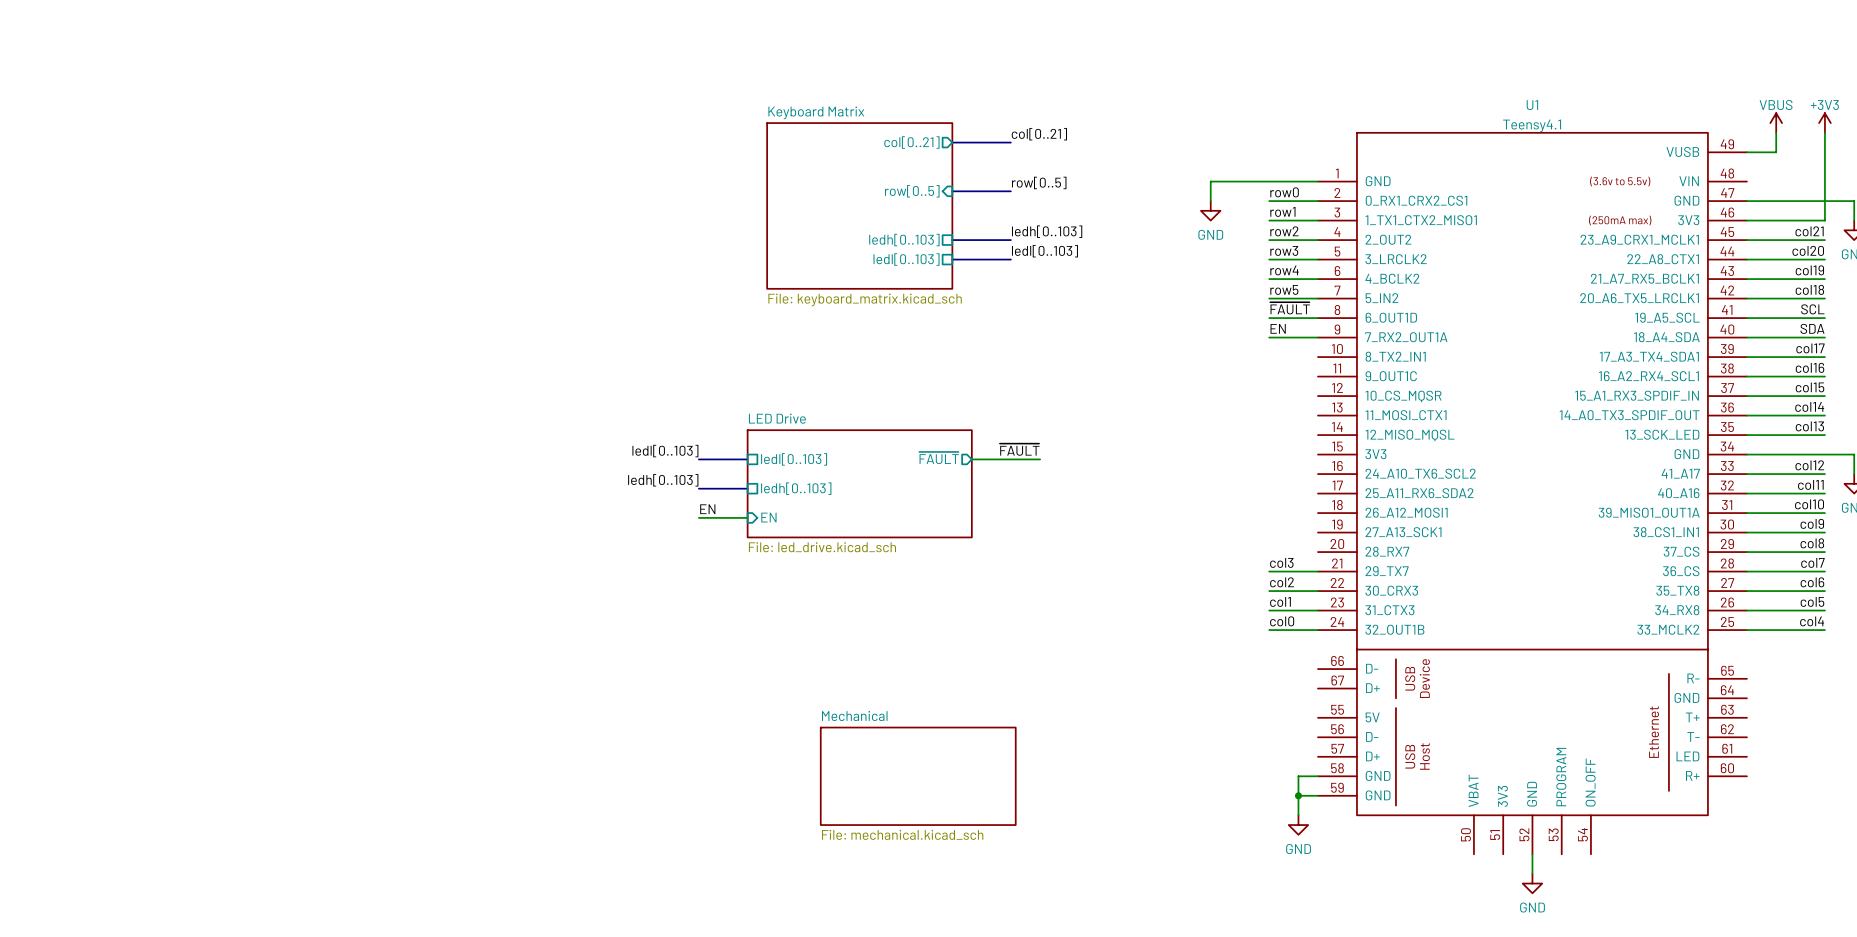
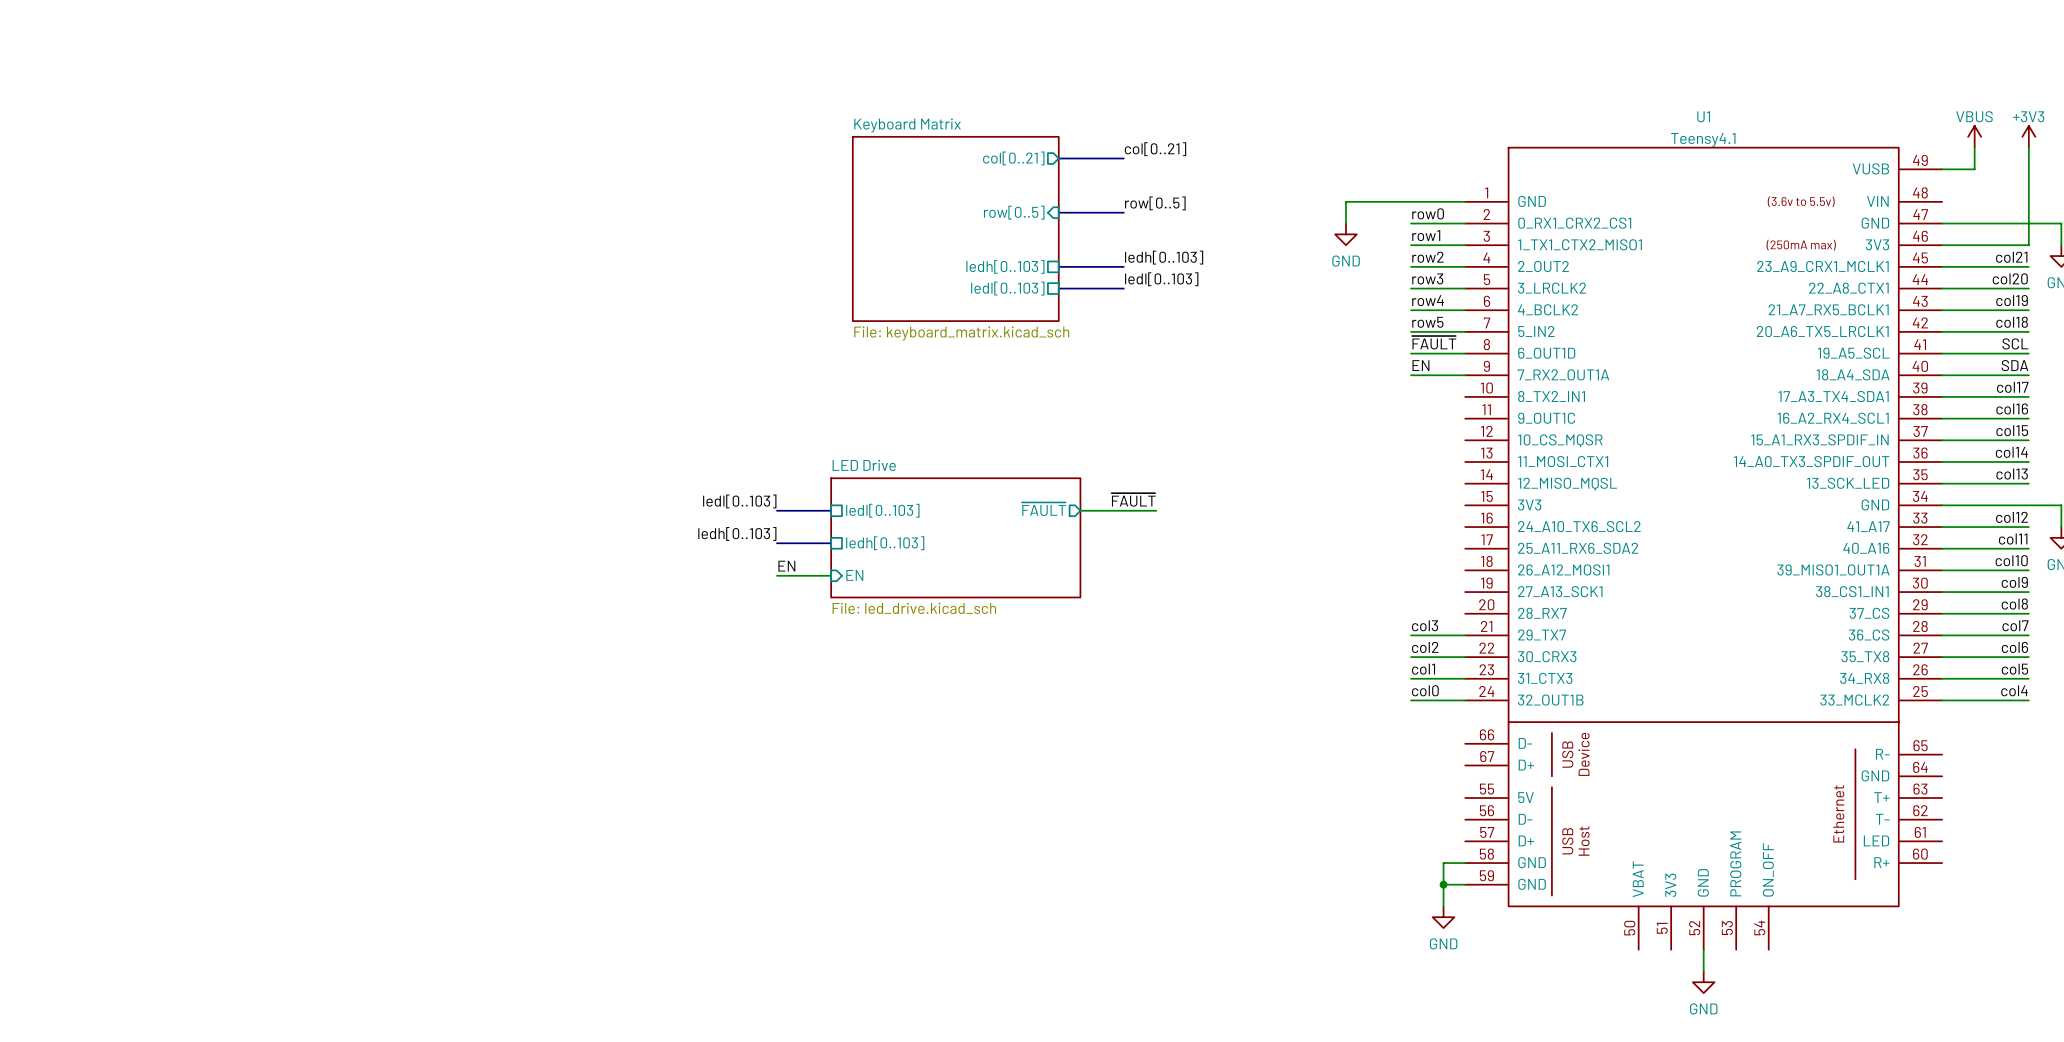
sheet Mechanical: File: mechanical.kicad_sch (918, 776) -> none

